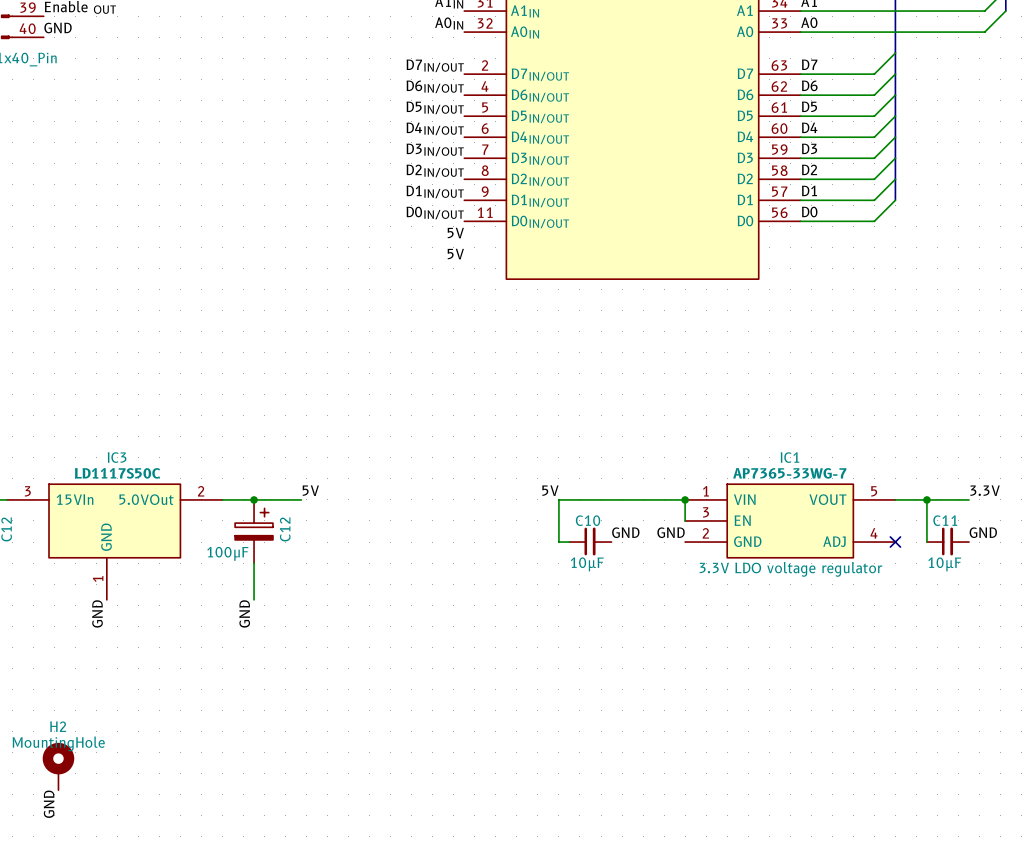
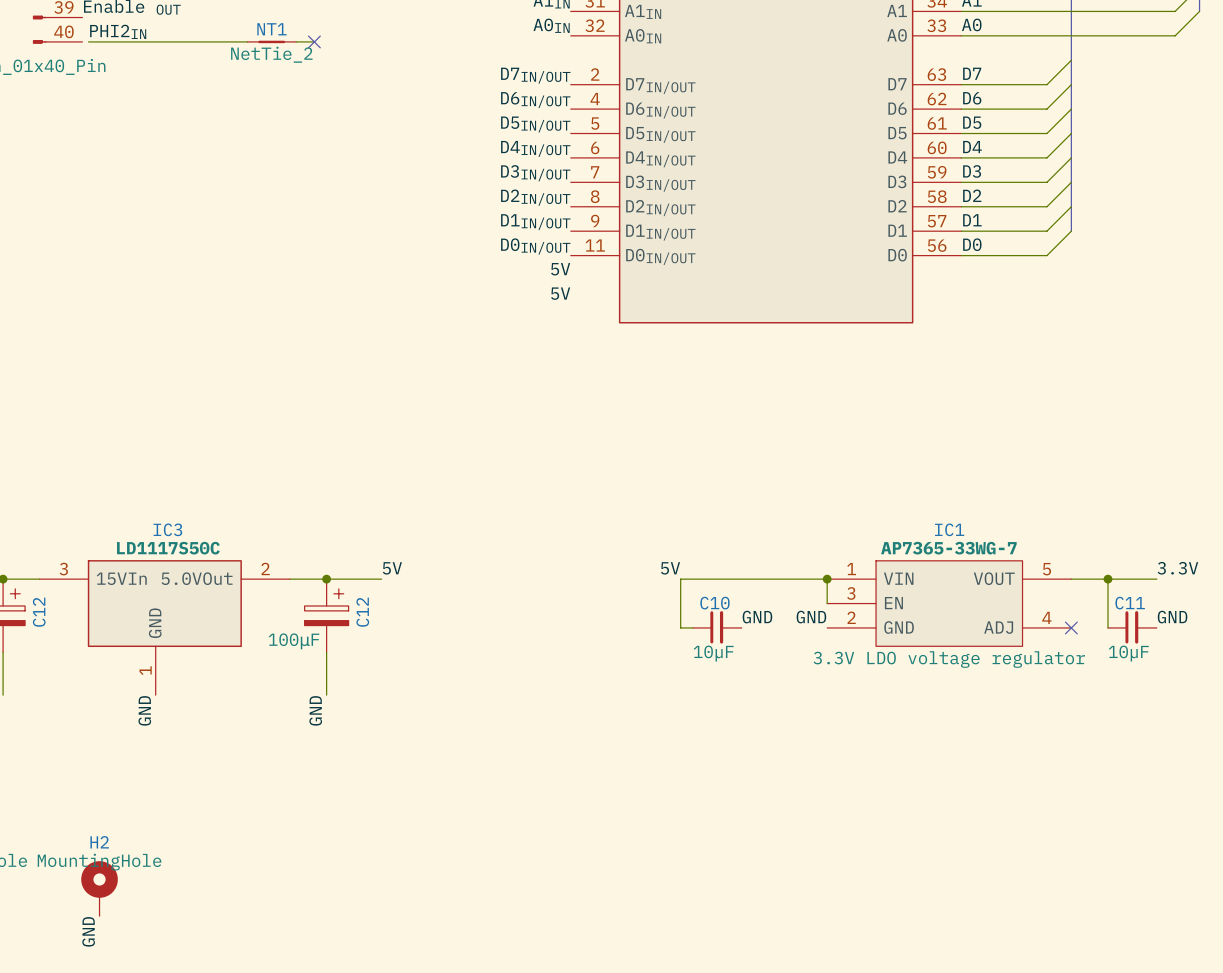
label: GND (58, 28) -> PHI2IN (118, 31)
wire: none -> (88, 41) (247, 41)
NT1: none -> NetTie_2 (271, 41)
wire: none -> (296, 41) (314, 41)
no-connect mark: none -> (314, 41)

